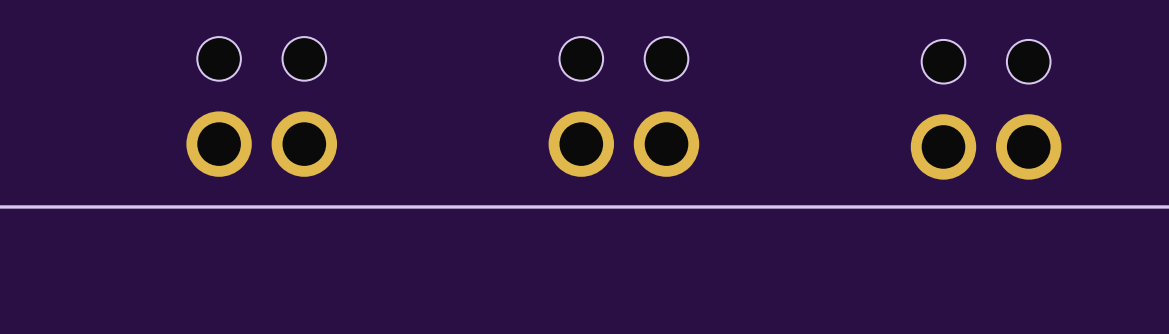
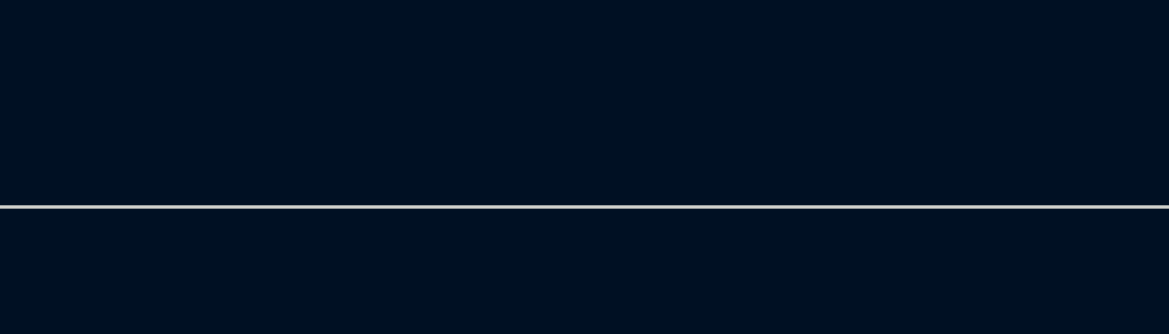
part: (261, 106) -> none
part: (623, 106) -> none
part: (986, 109) -> none

